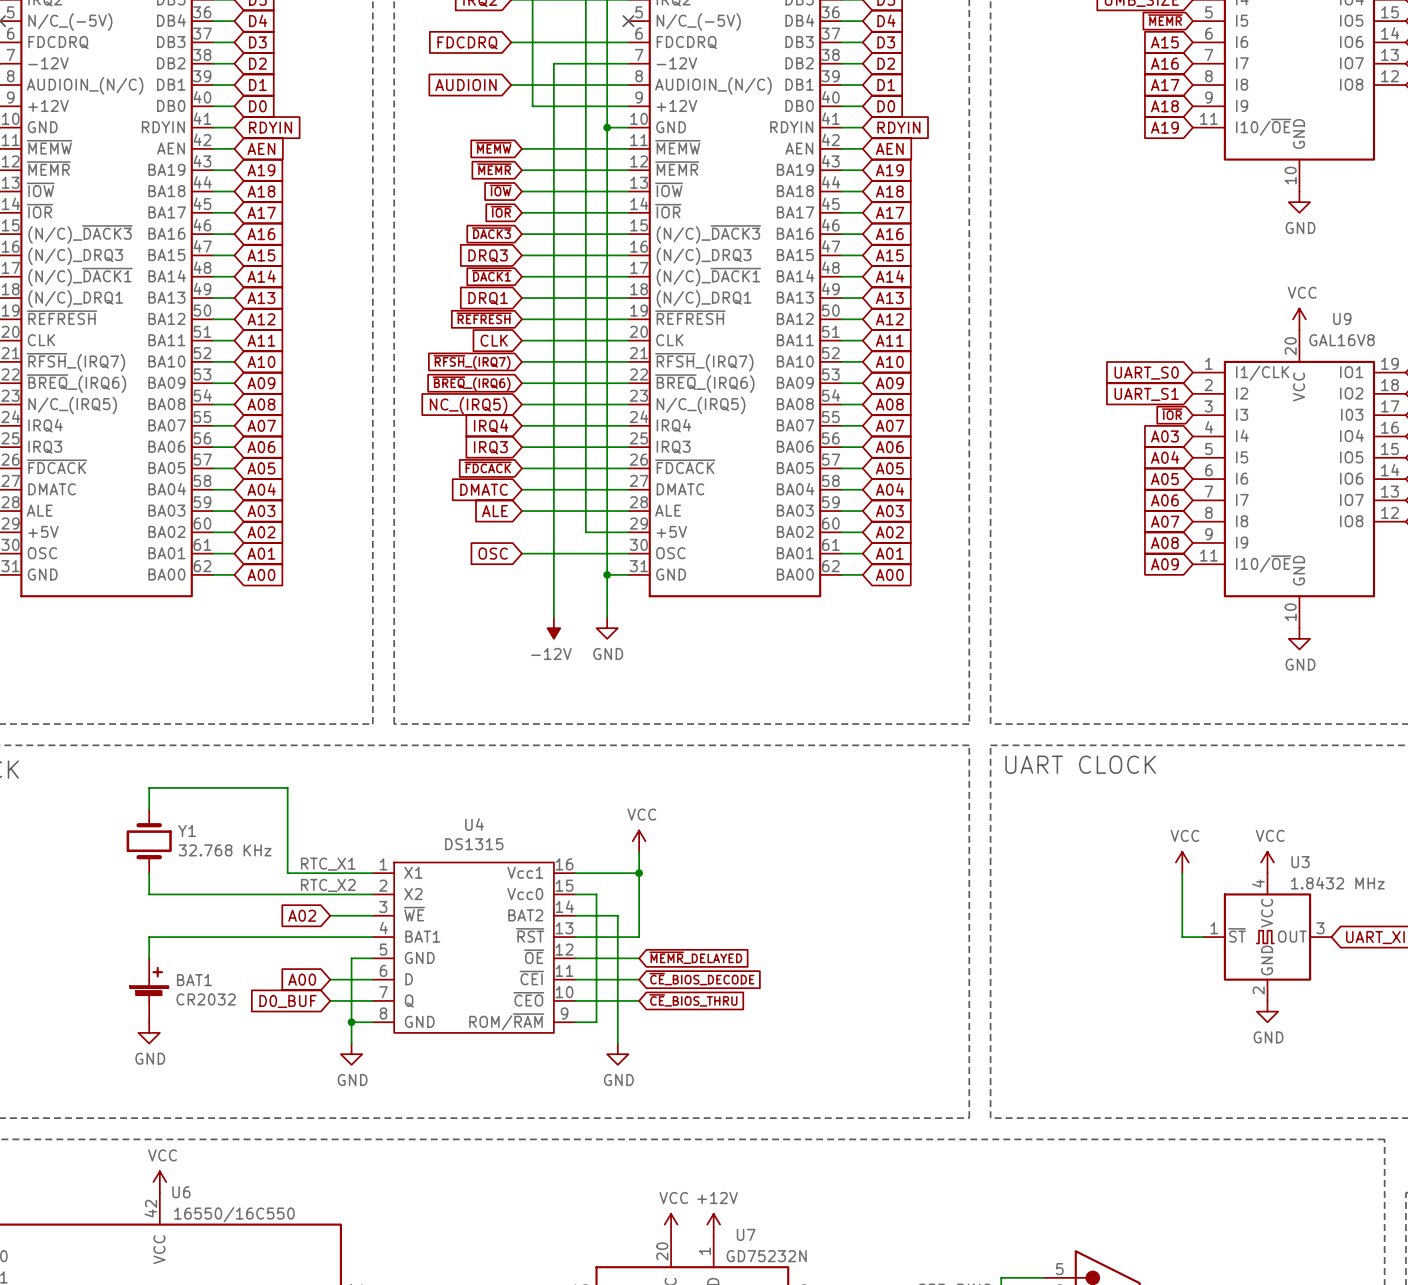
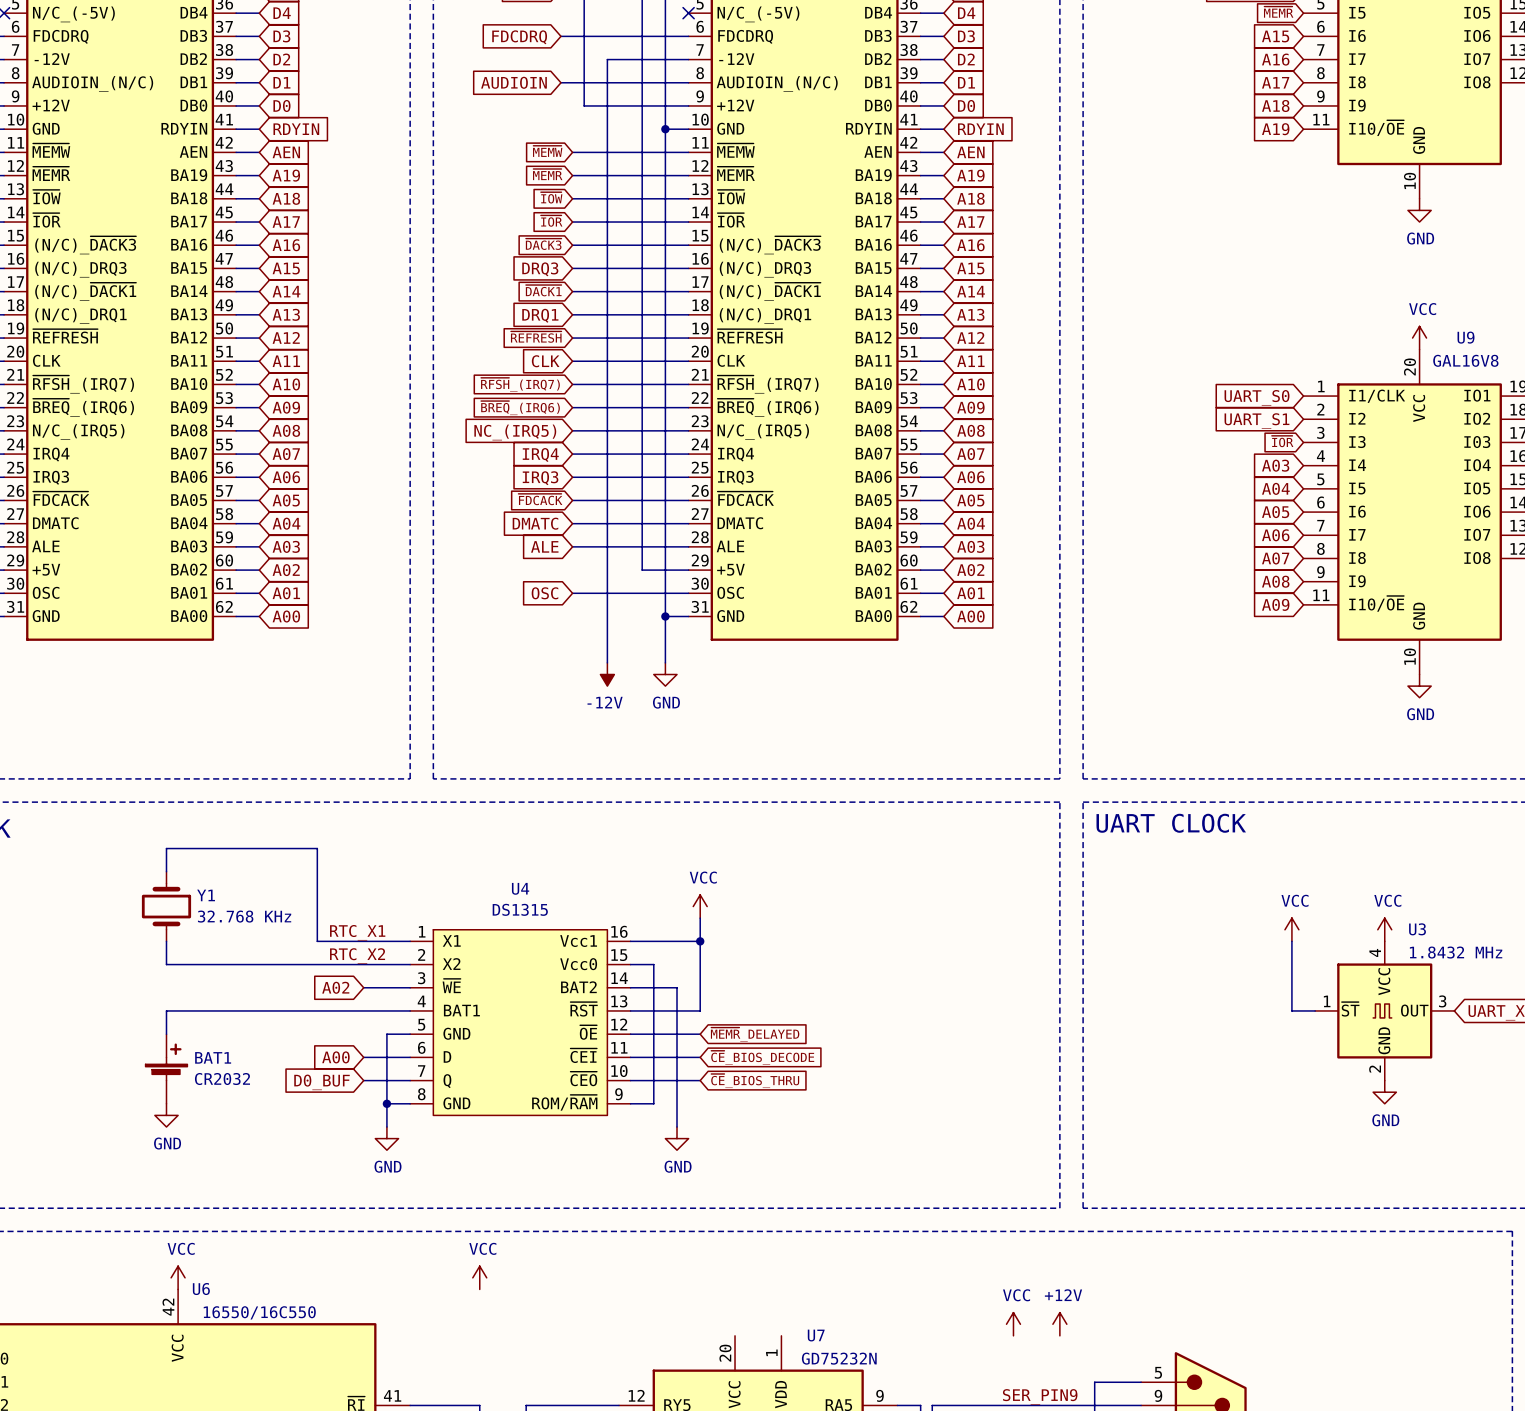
power symbol: none -> VCC (479, 1277)
power symbol: VCC (671, 1224) -> none
power symbol: +12V (713, 1224) -> none
power symbol: none -> VCC (1013, 1324)
power symbol: none -> +12V (1059, 1324)

